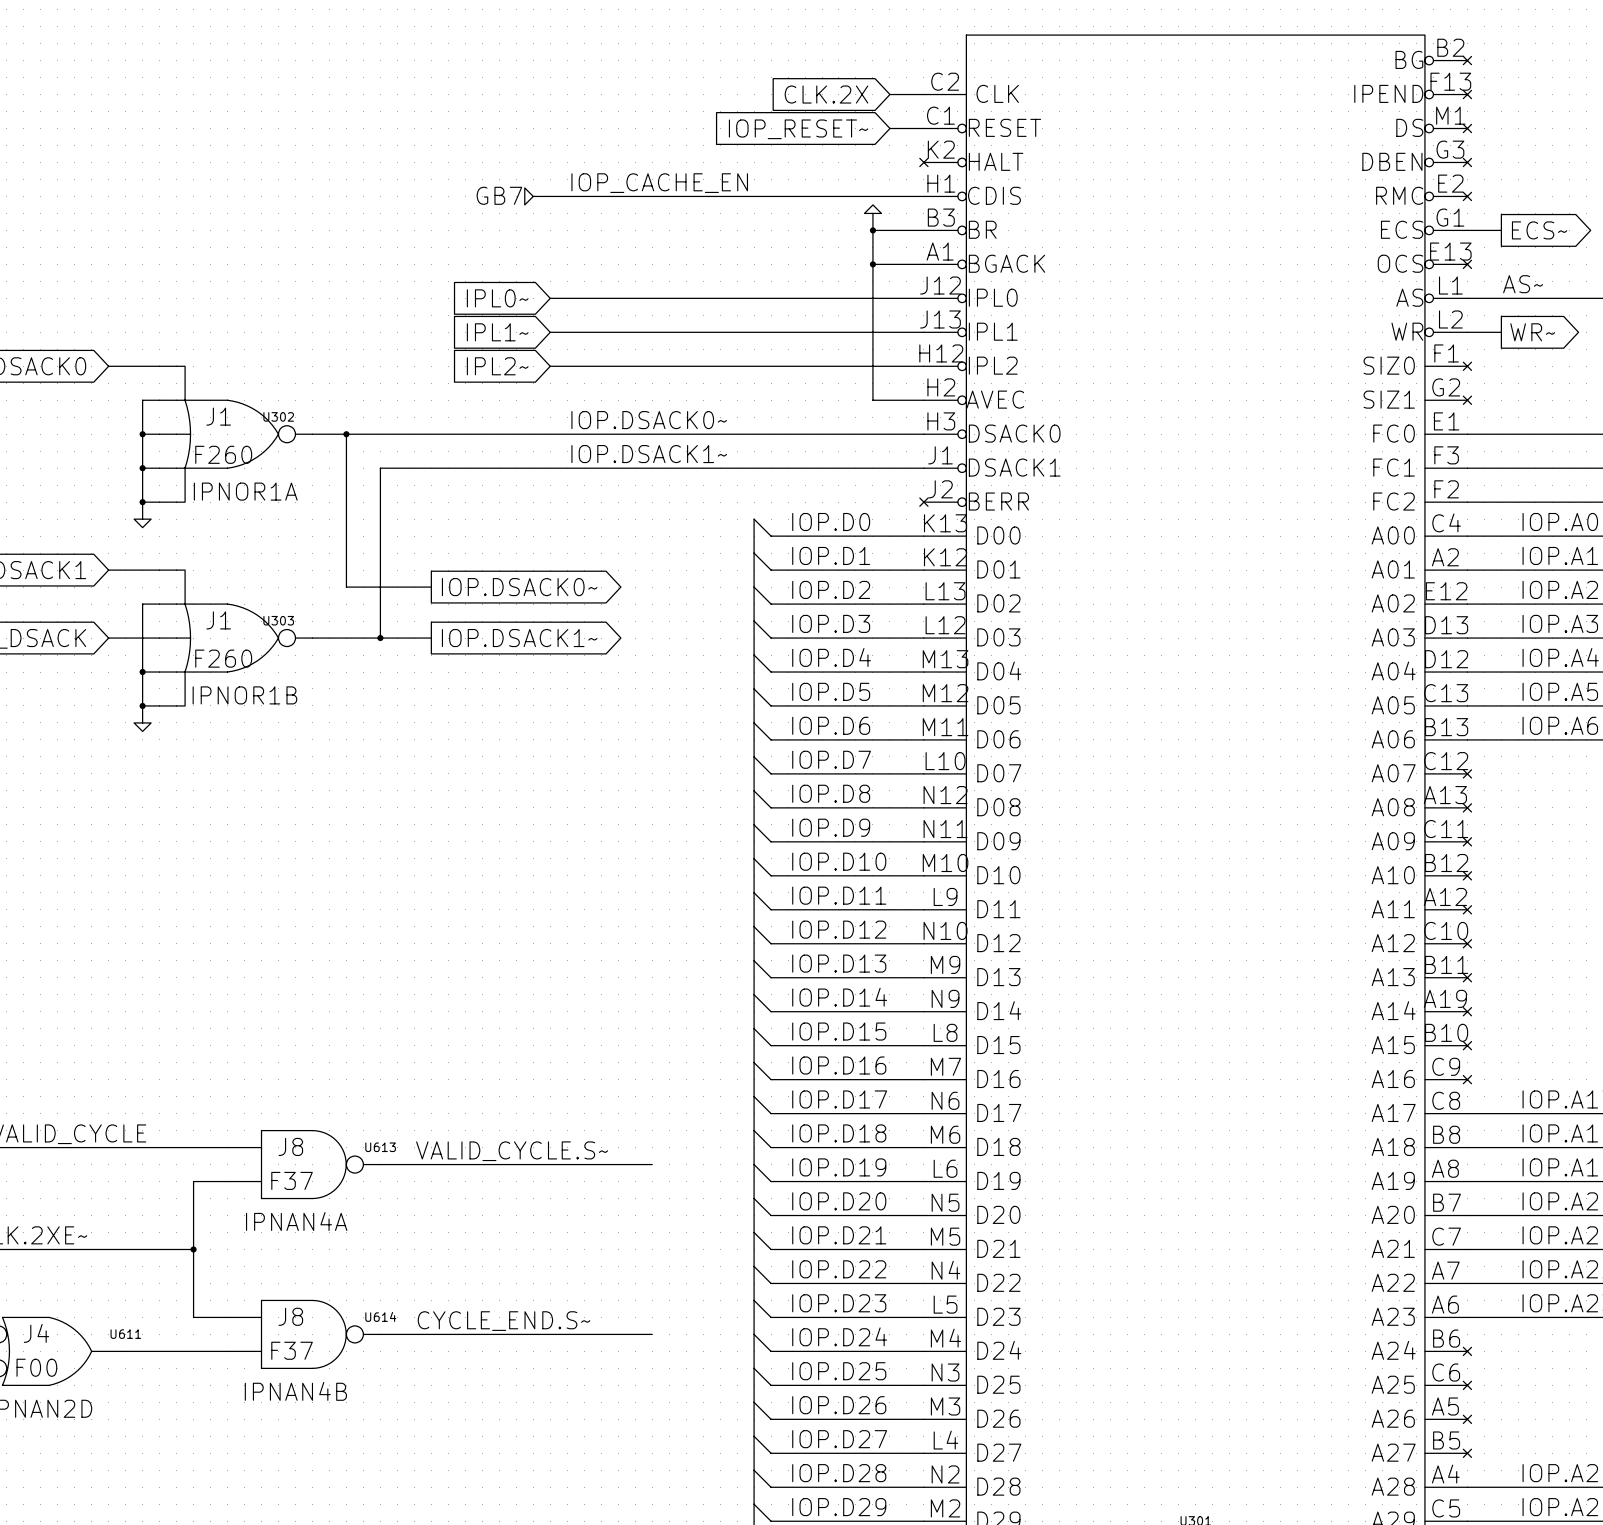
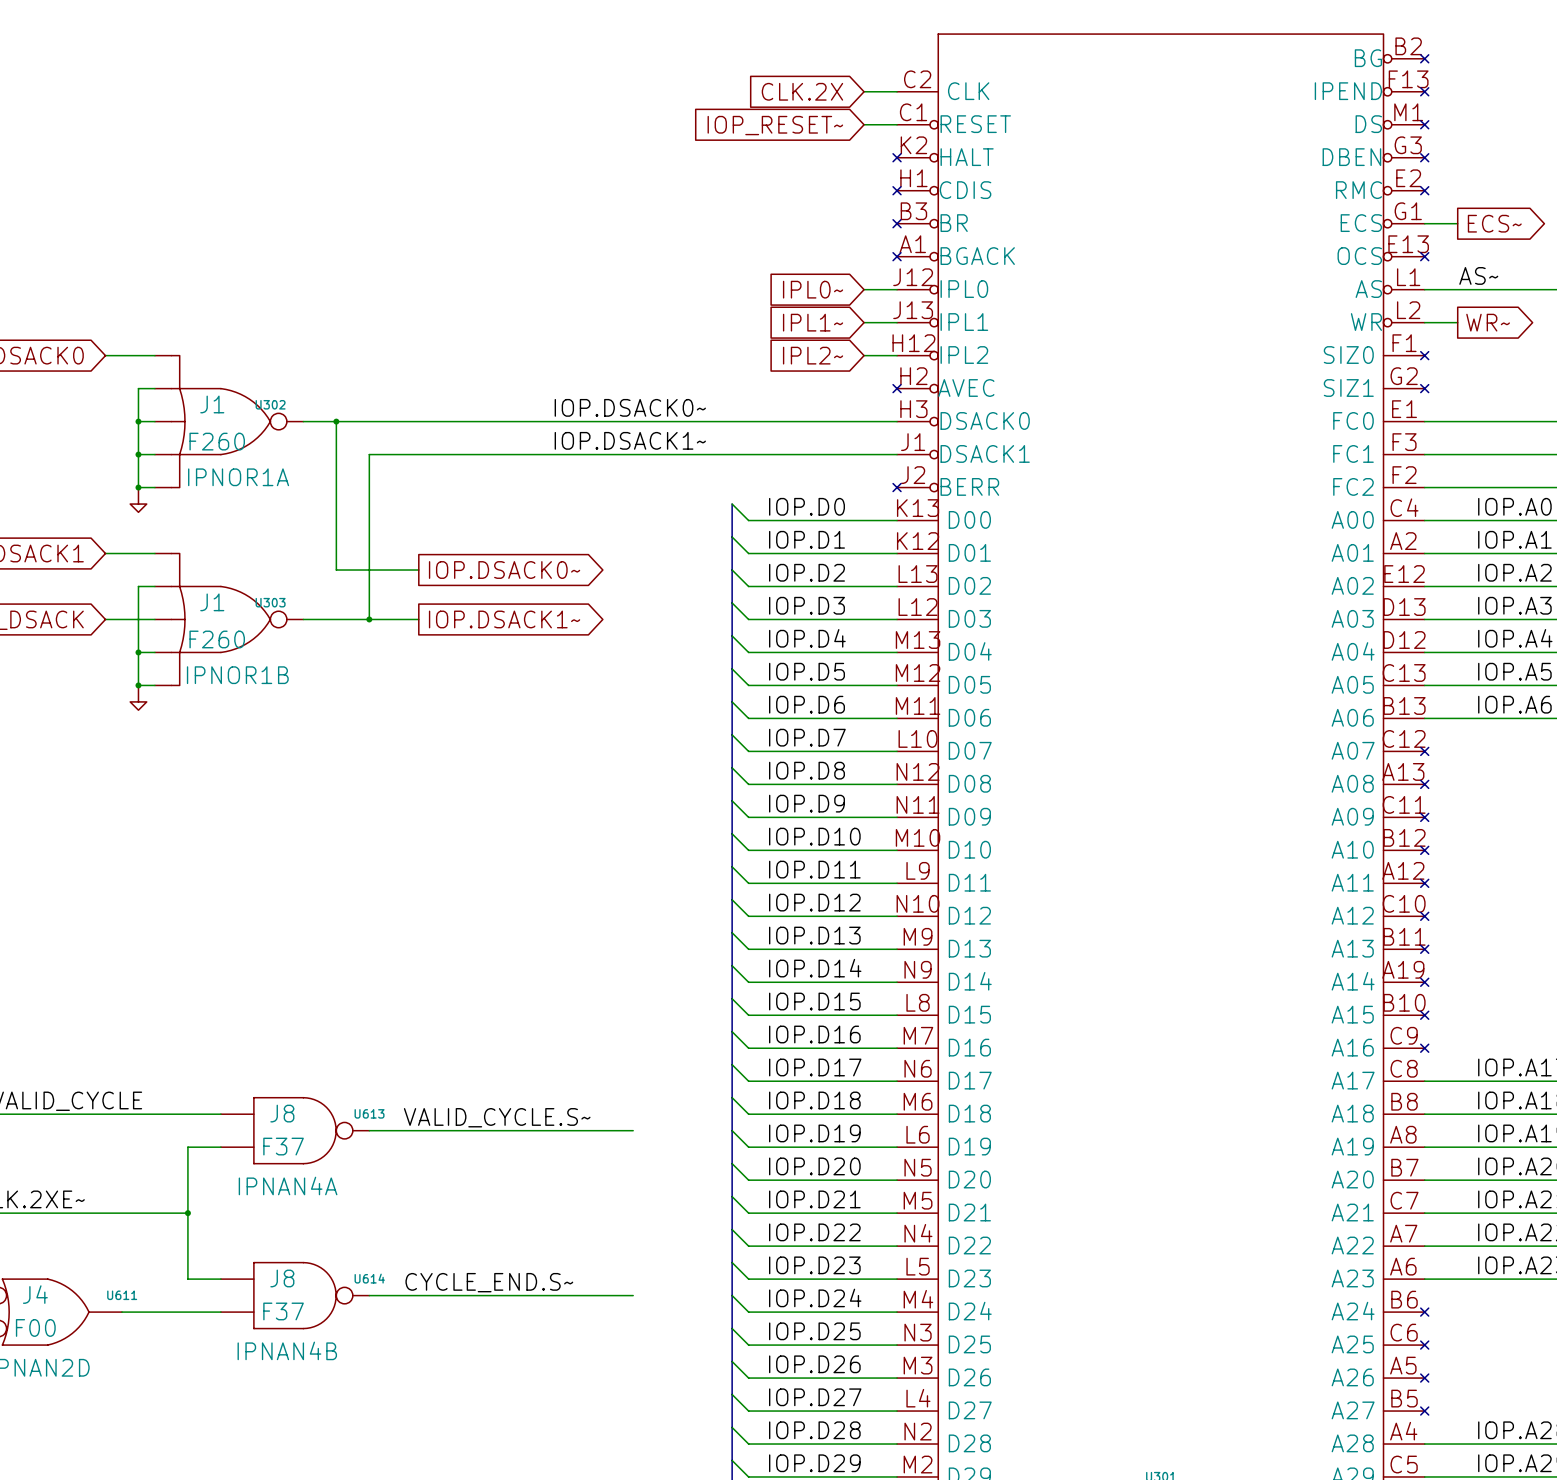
label: IOP_CACHE_EN (659, 183) -> none
GB7: (537, 196) -> none
wire: (550, 196) (923, 196) -> none
no-connect mark: none -> (897, 190)
power symbol: (872, 217) -> none
junction: (872, 230) -> none
wire: (923, 230) (872, 230) (872, 400) (923, 400) -> none
no-connect mark: none -> (897, 223)
wire: (872, 264) (923, 264) -> none
junction: (872, 264) -> none
no-connect mark: none -> (897, 256)
global label: IPL0~ (497, 298) -> none
wire: (550, 298) (889, 298) -> none
global label: none -> IPL0~ (813, 289)
global label: IPL1~ (497, 332) -> none
wire: (550, 332) (889, 332) -> none
global label: none -> IPL1~ (813, 322)
global label: IPL2~ (497, 366) -> none
wire: (550, 366) (889, 366) -> none
global label: none -> IPL2~ (813, 355)
no-connect mark: none -> (897, 388)

